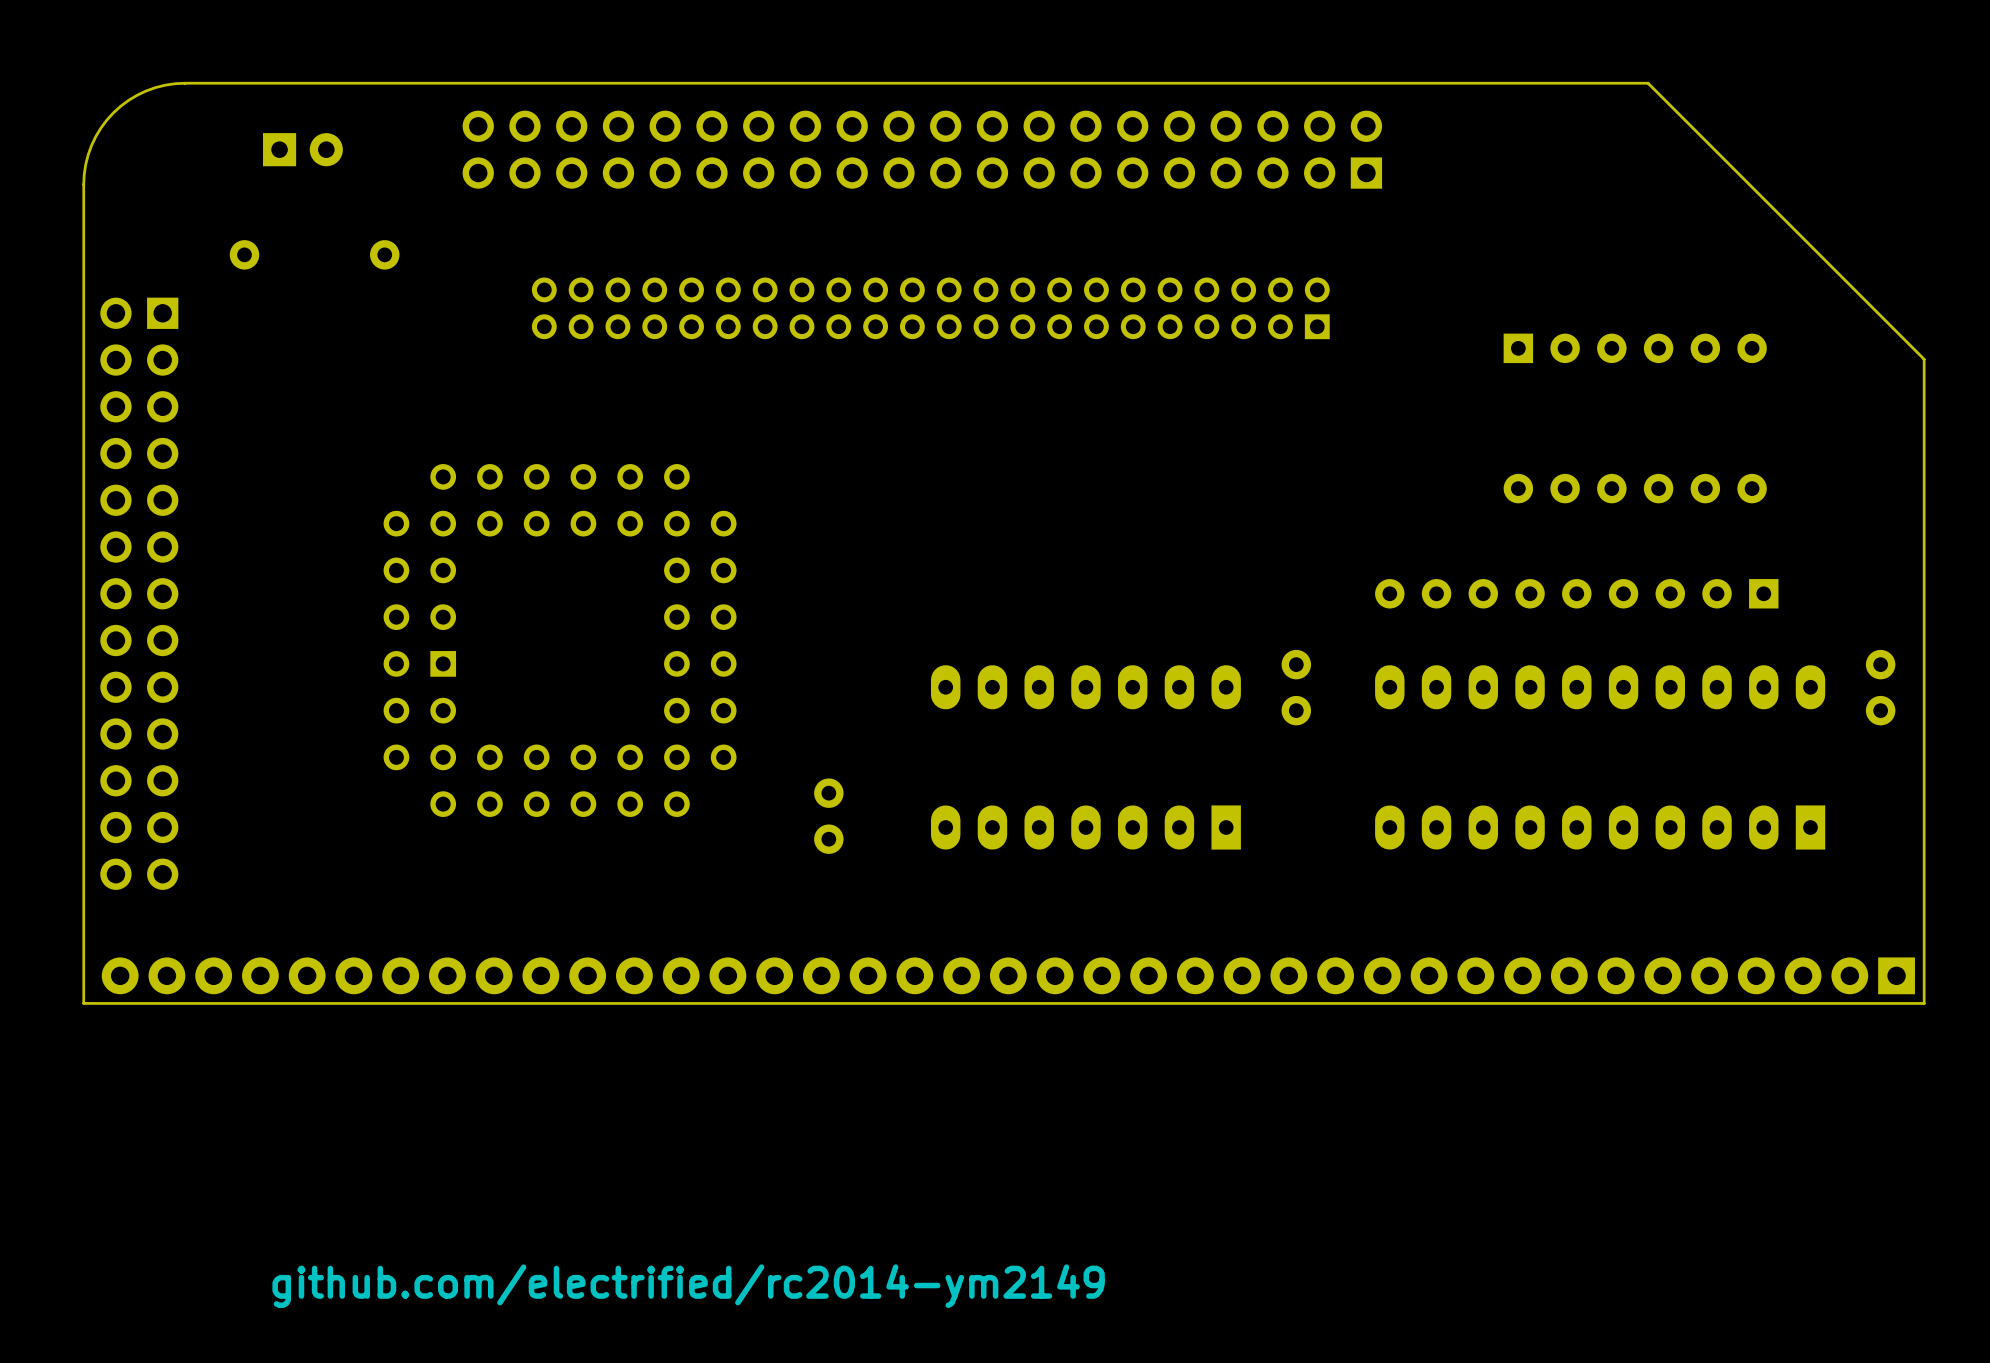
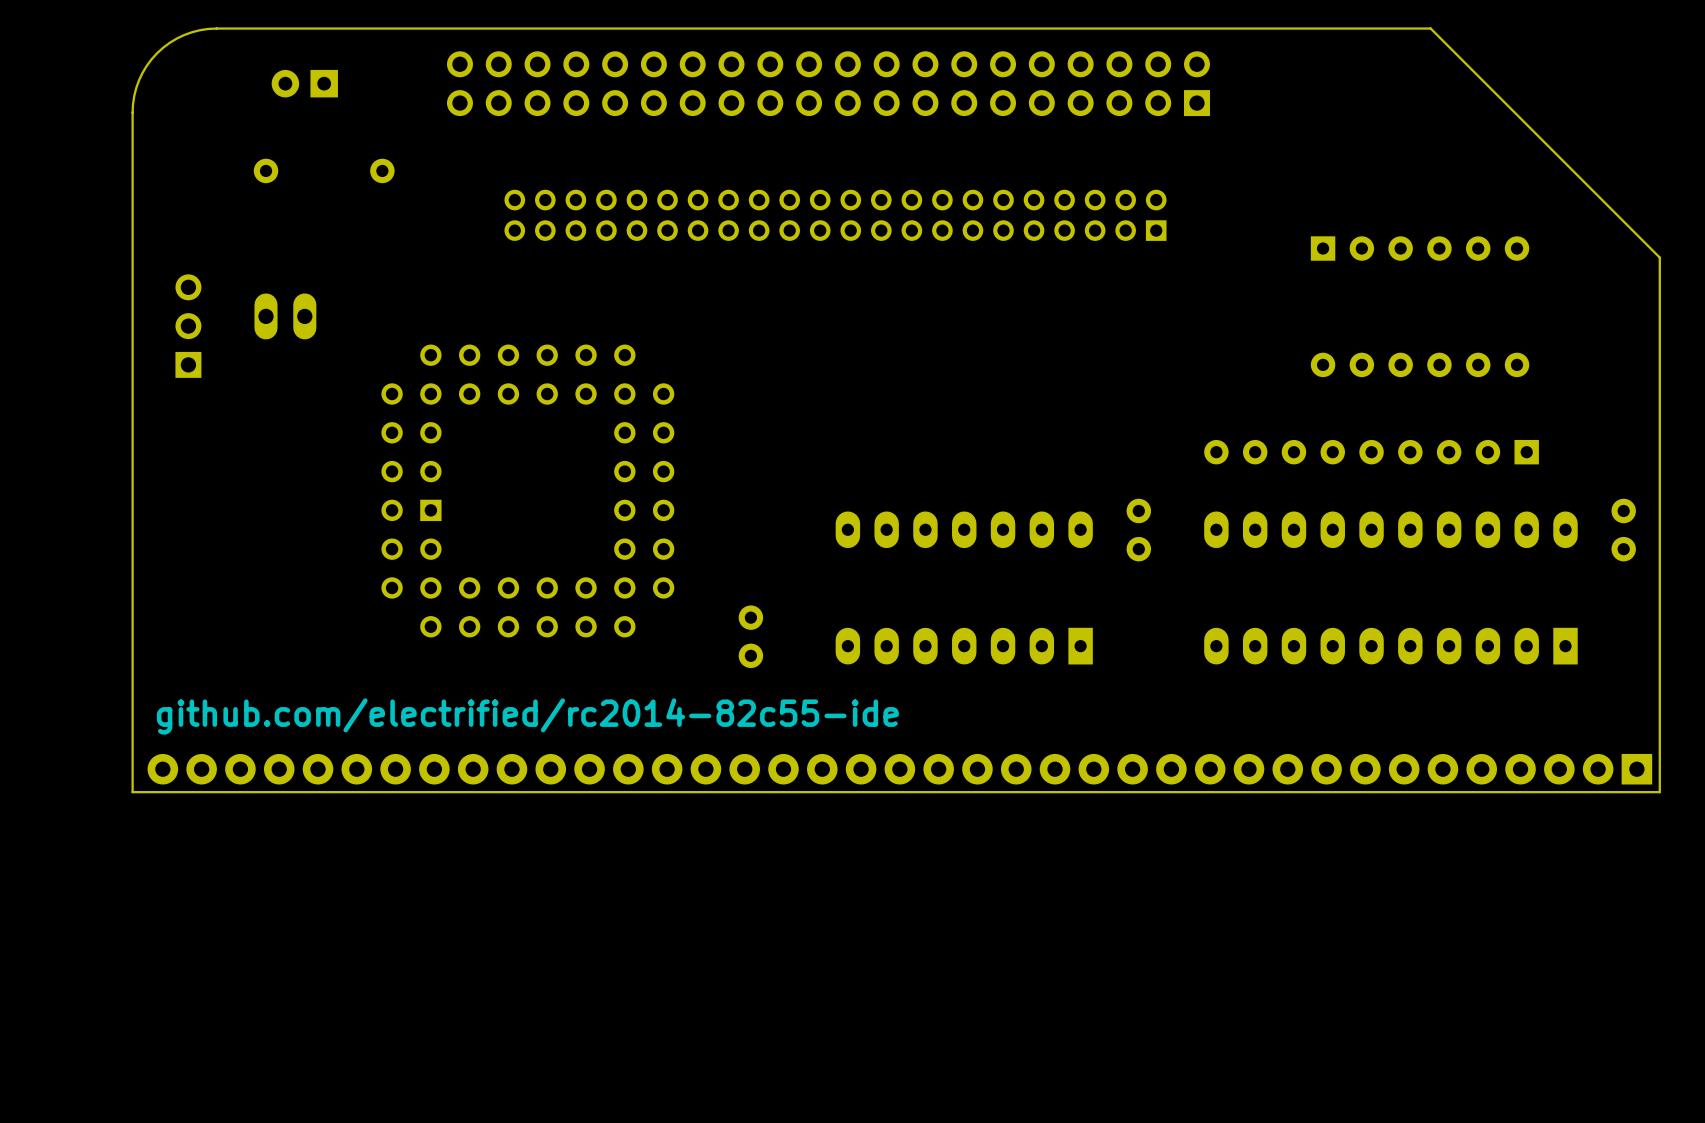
part rotation: 0° (302, 149) -> 180° (304, 83)
part: none -> (285, 316)
part: none -> (188, 326)
part: (139, 593) -> none
text: none -> github.com/electrified/rc2014-82c55-ide (527, 716)
text: github.com/electrified/rc2014-ym2149 (688, 1286) -> none

